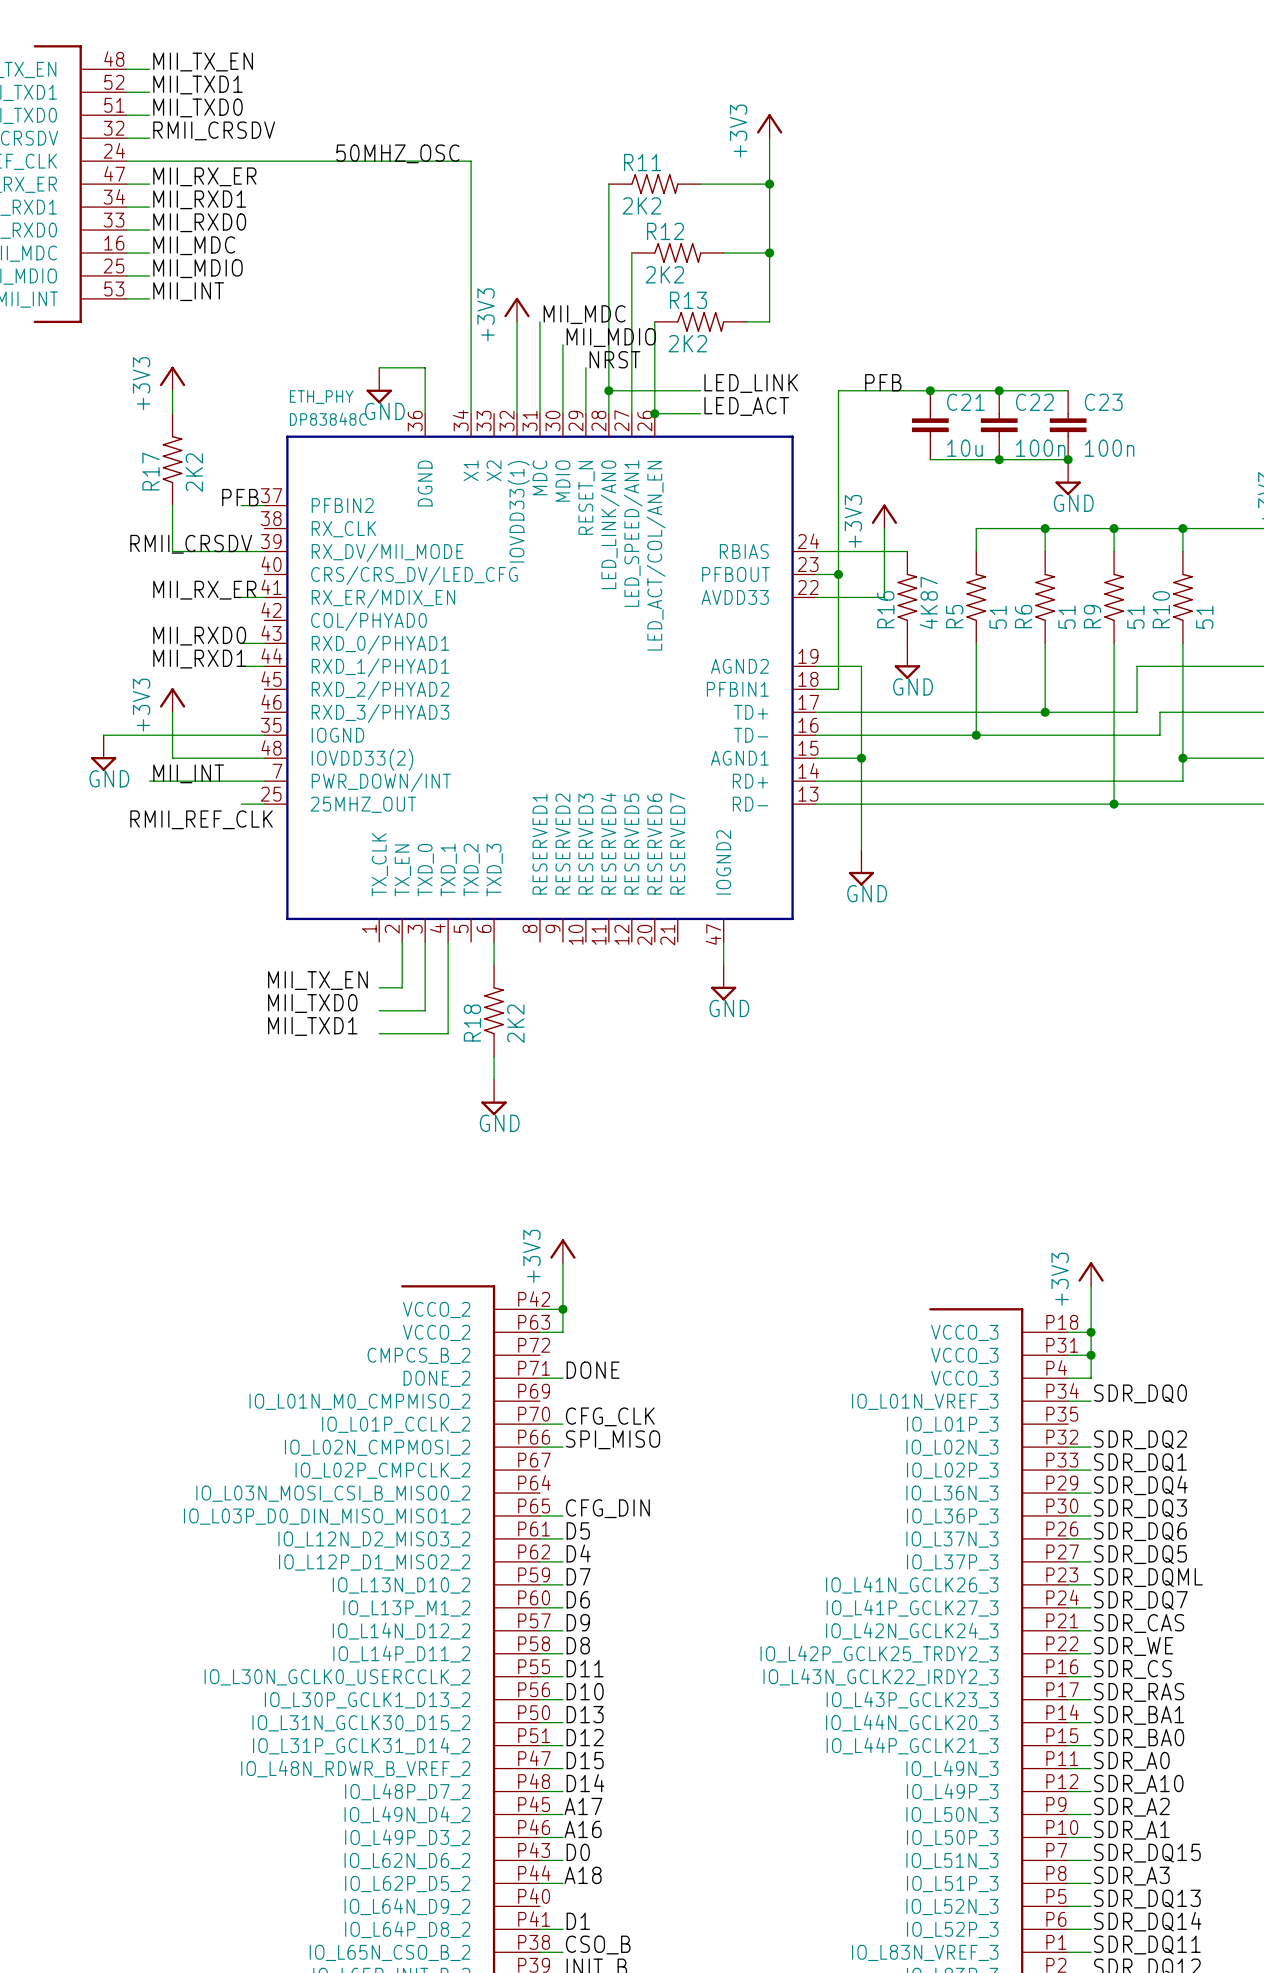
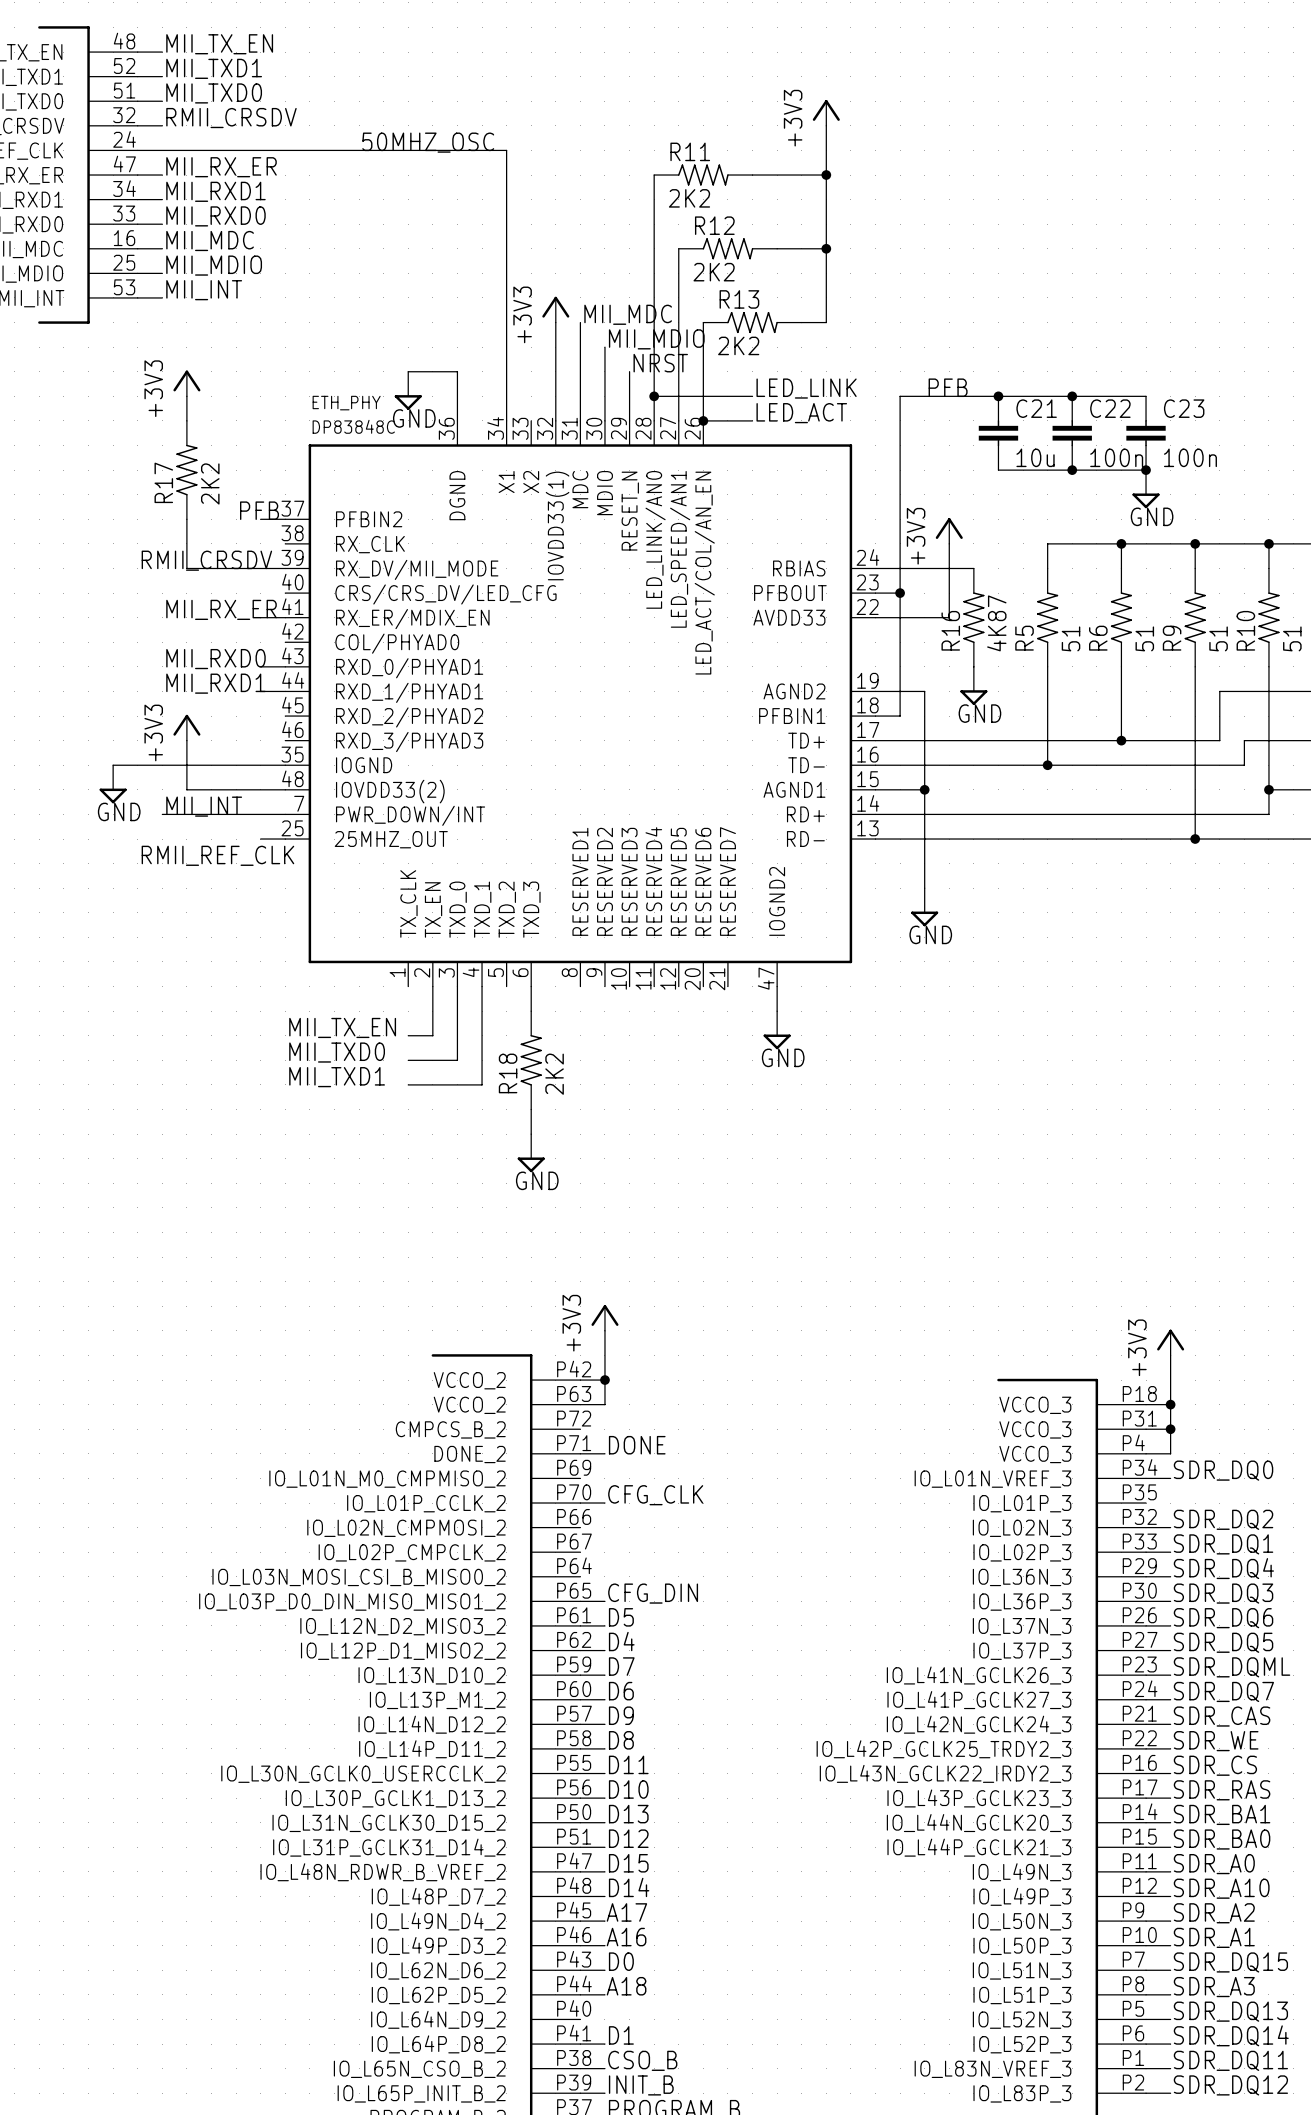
label: SPI_MISO (613, 1439) -> none
wire: (539, 1447) (562, 1447) -> none

